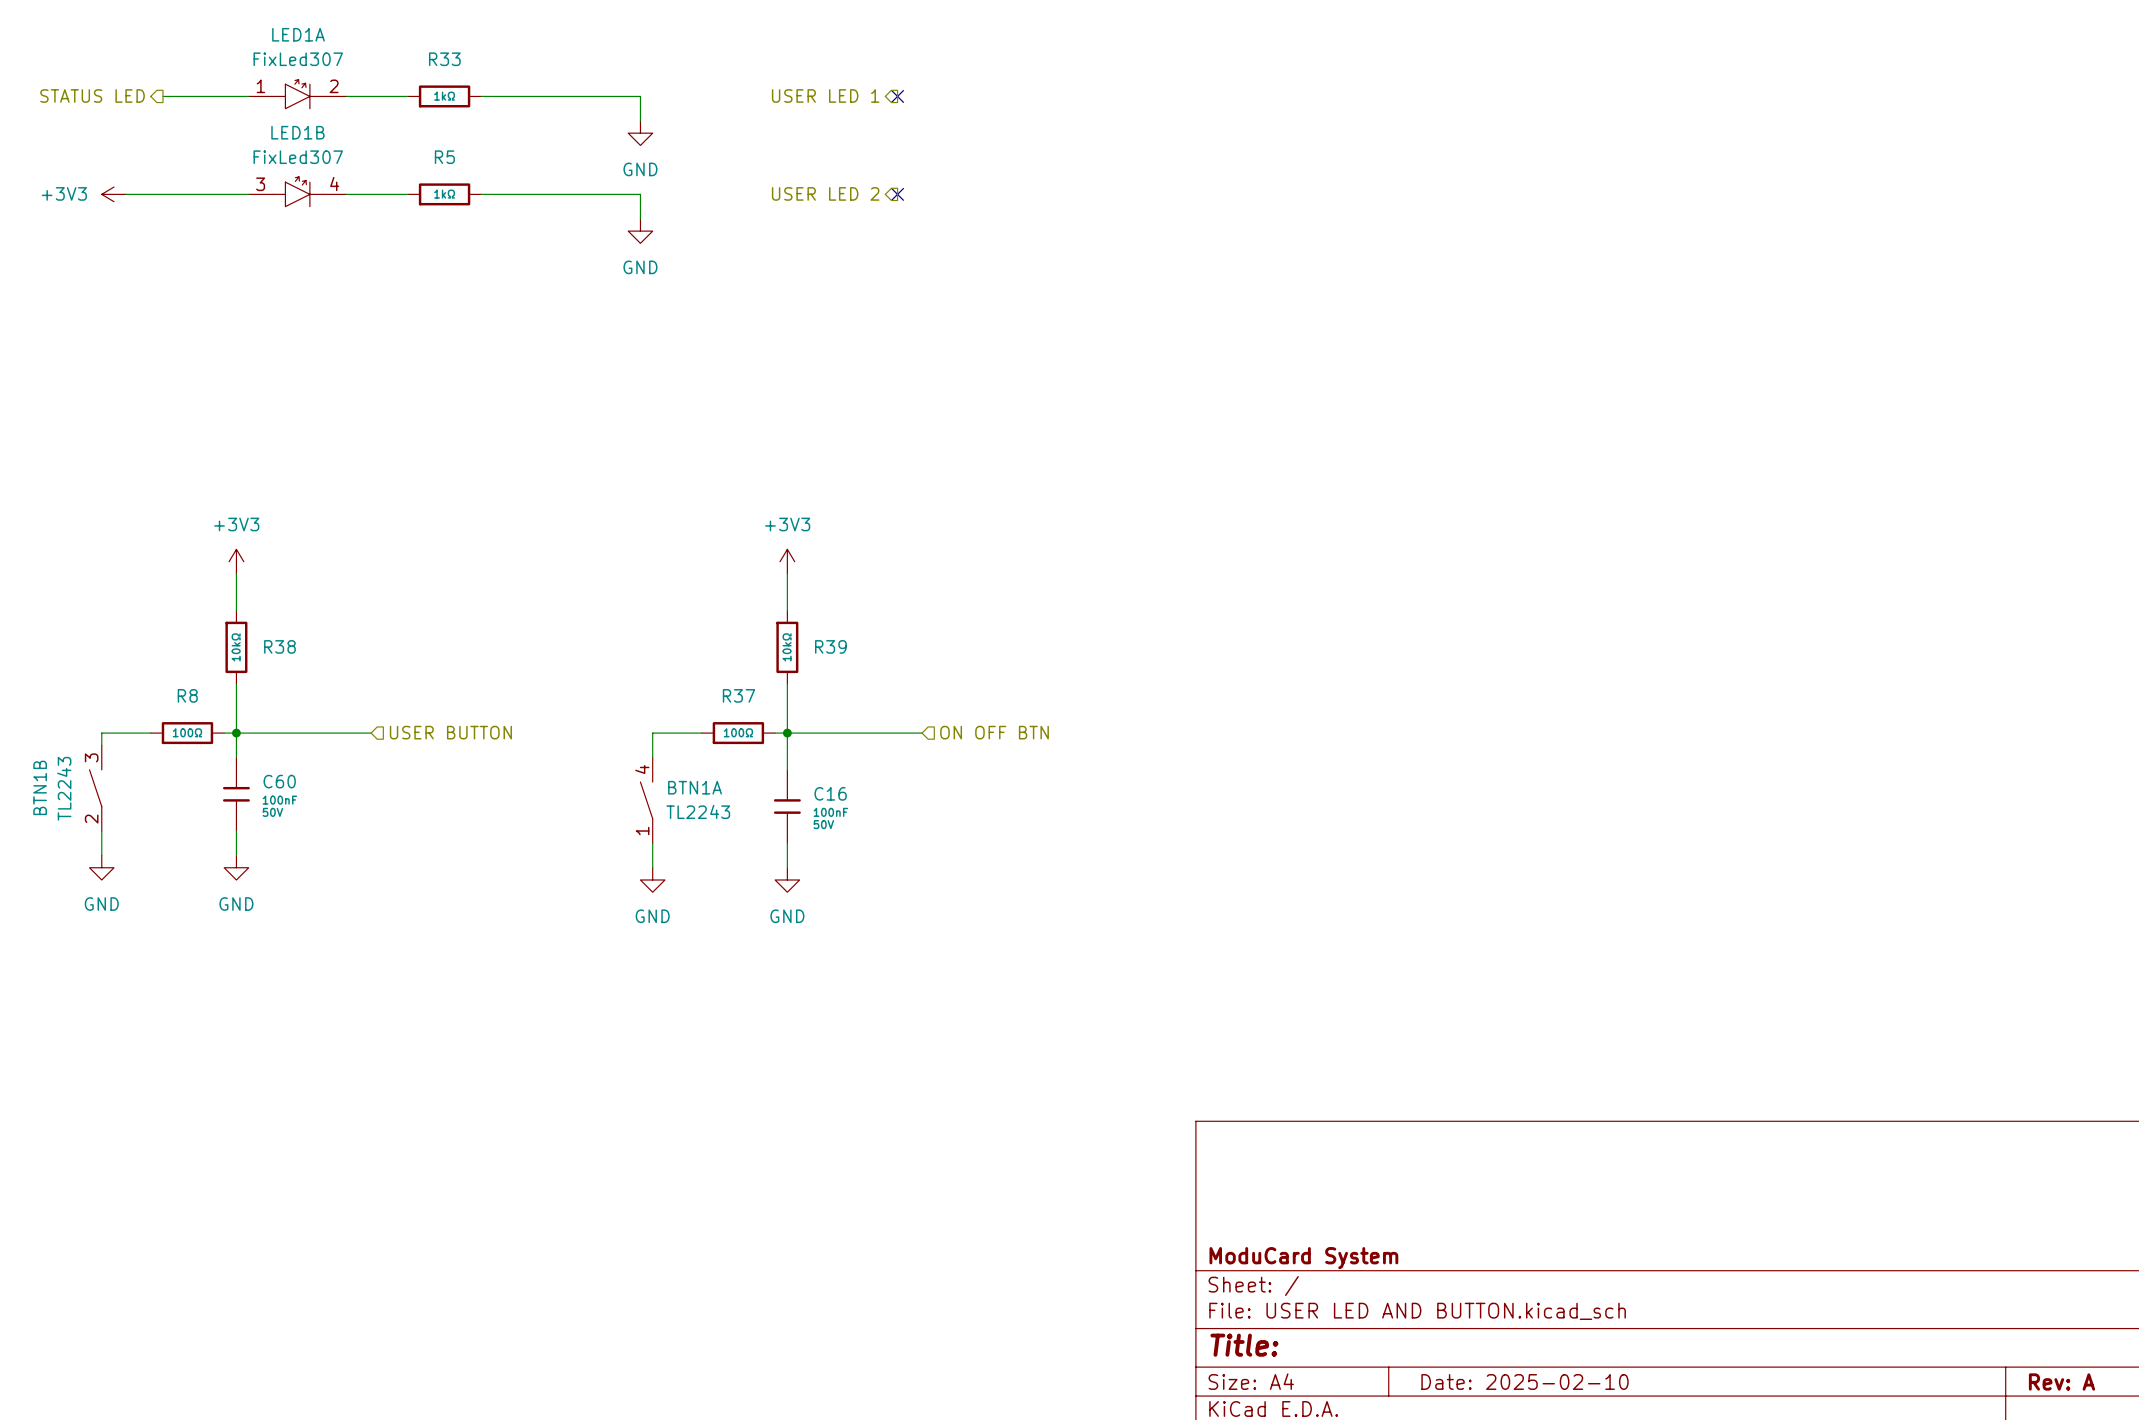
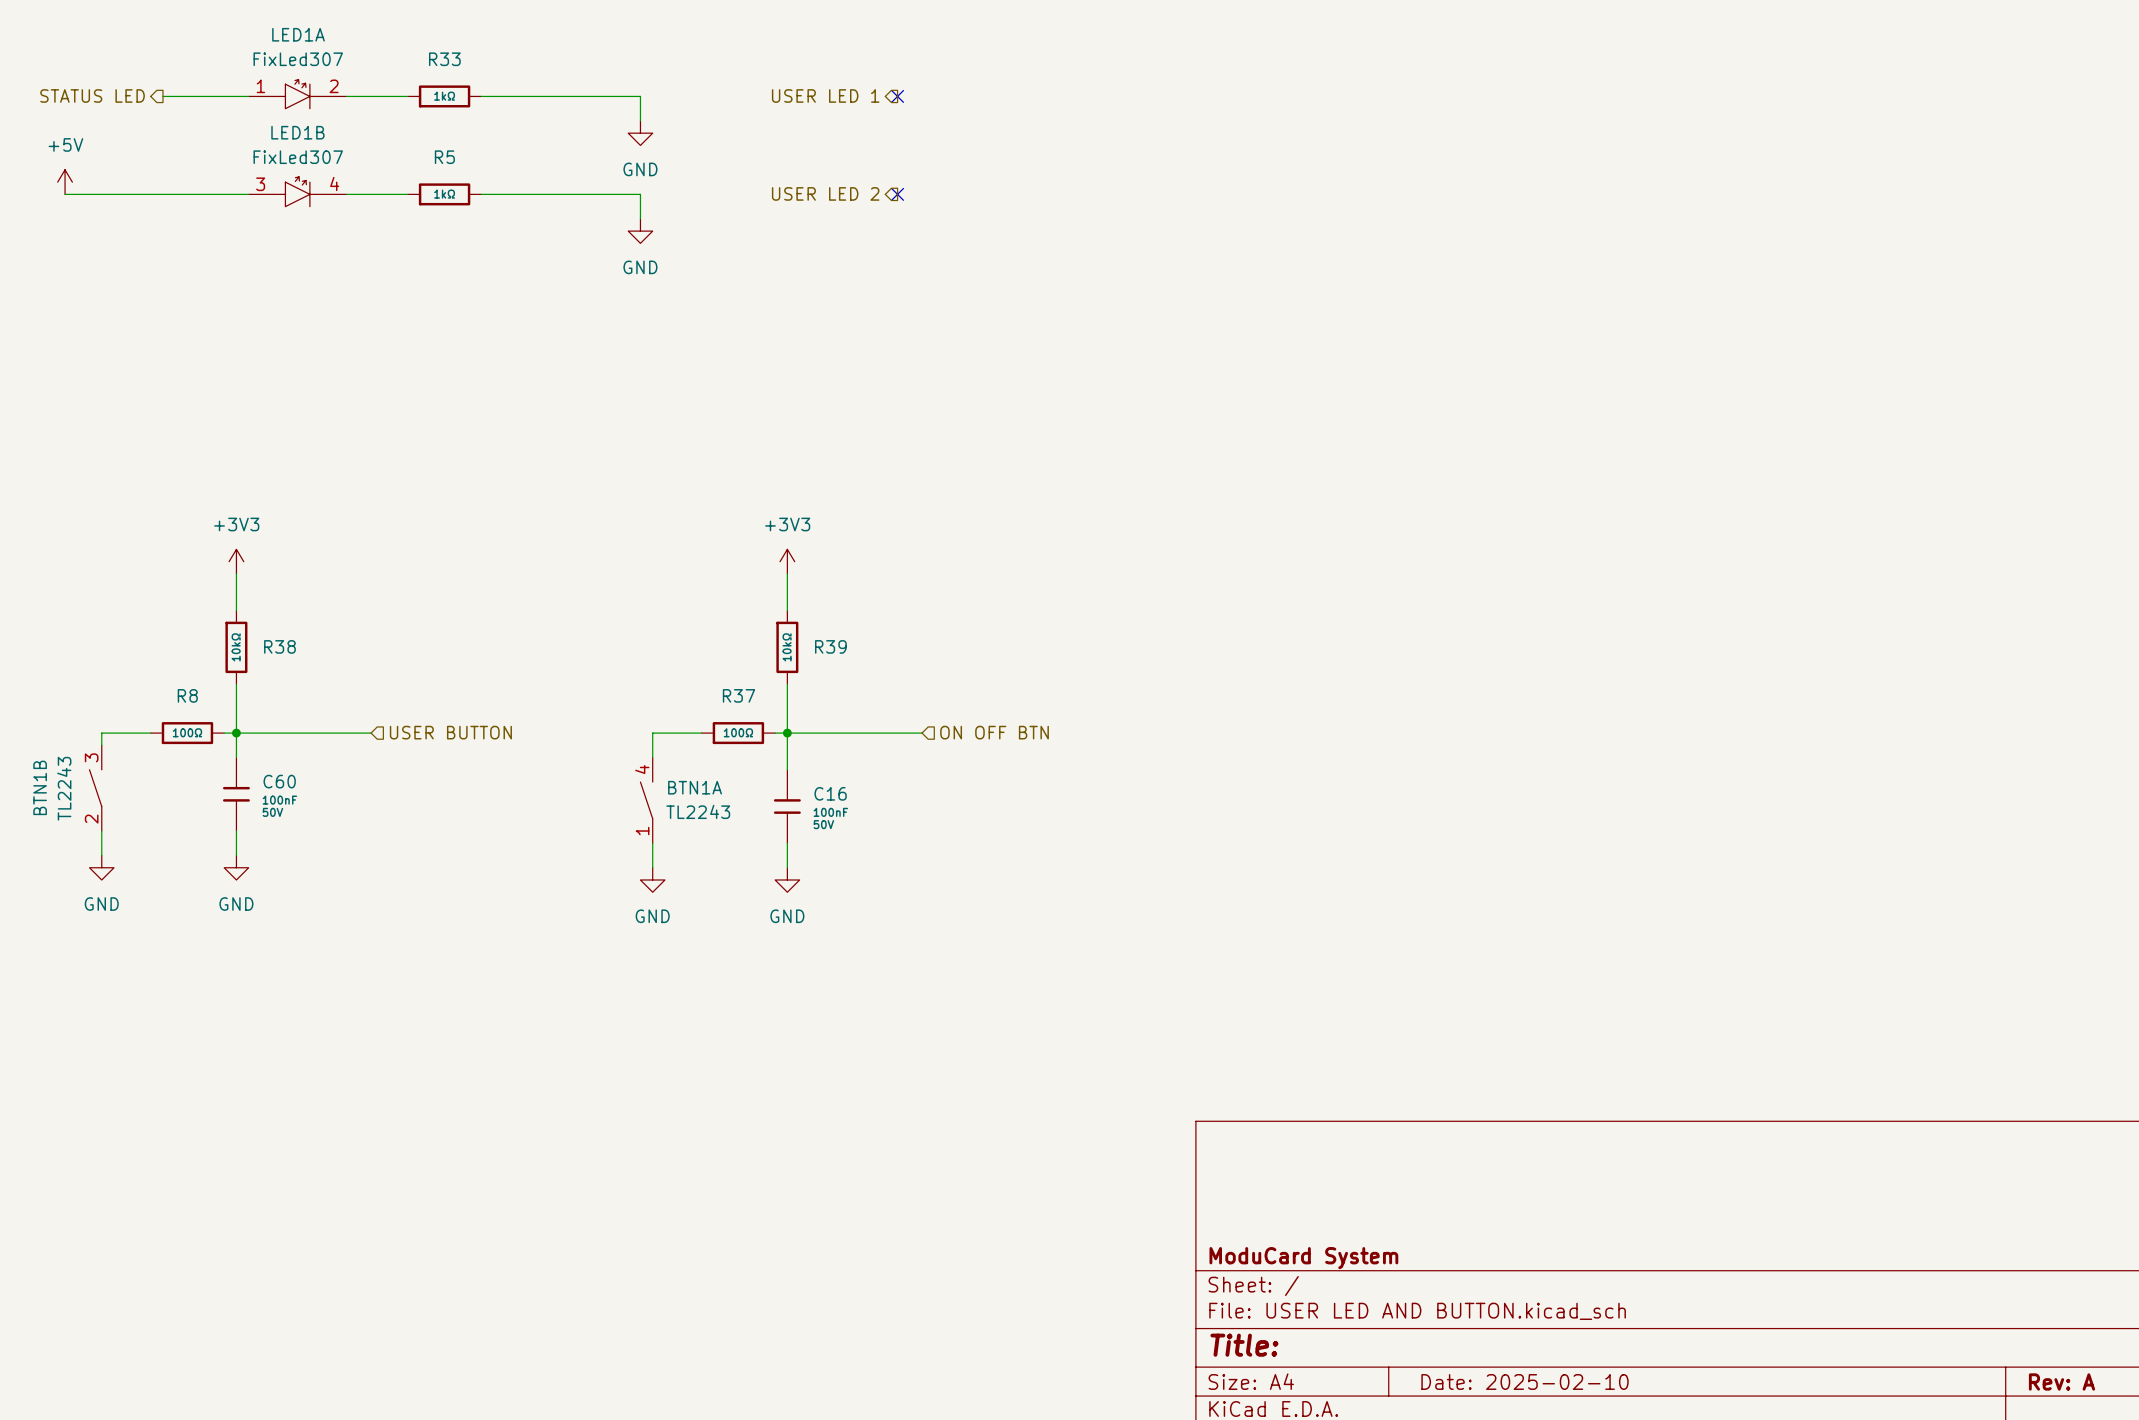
power symbol: none -> +5V (65, 182)
wire: none -> (65, 194) (126, 194)
power symbol: +3V3 (114, 194) -> none

